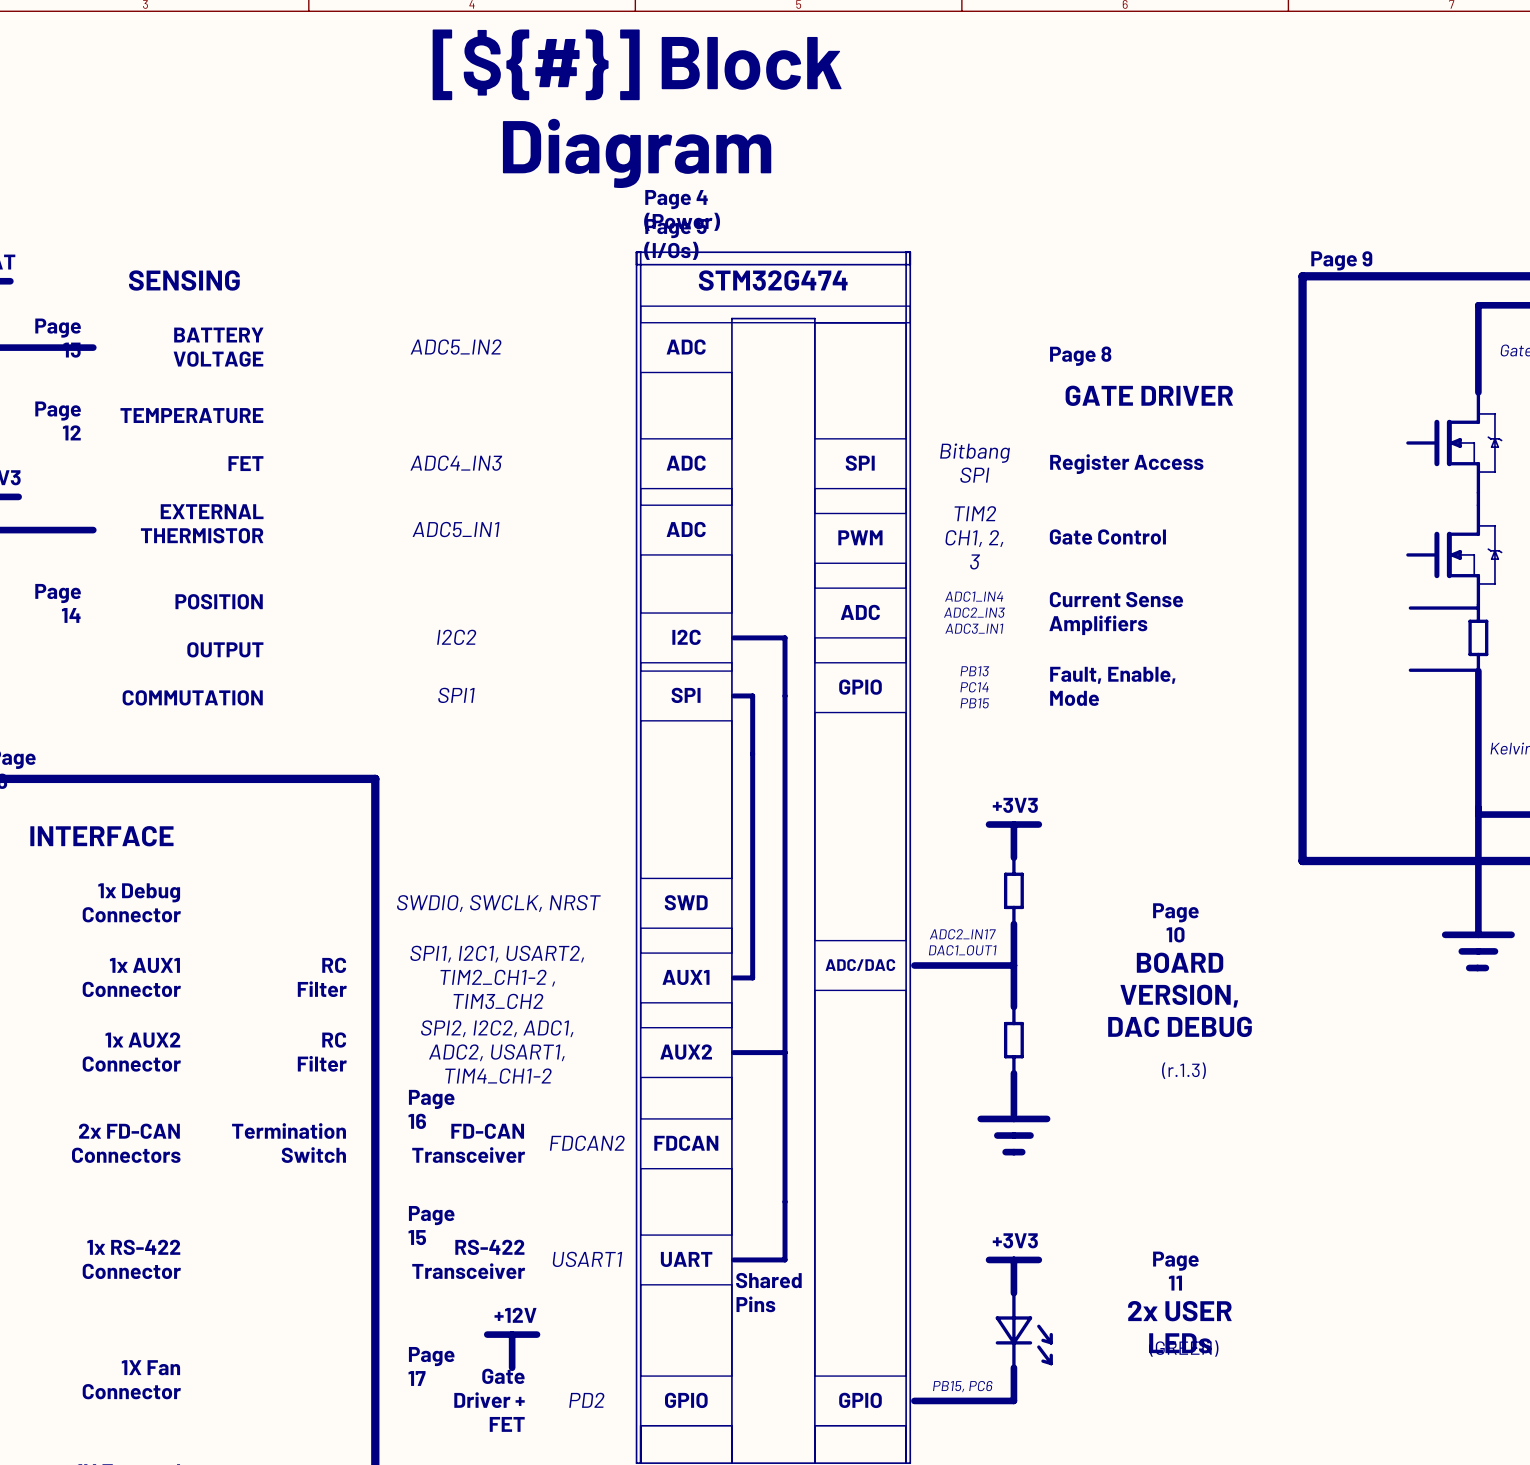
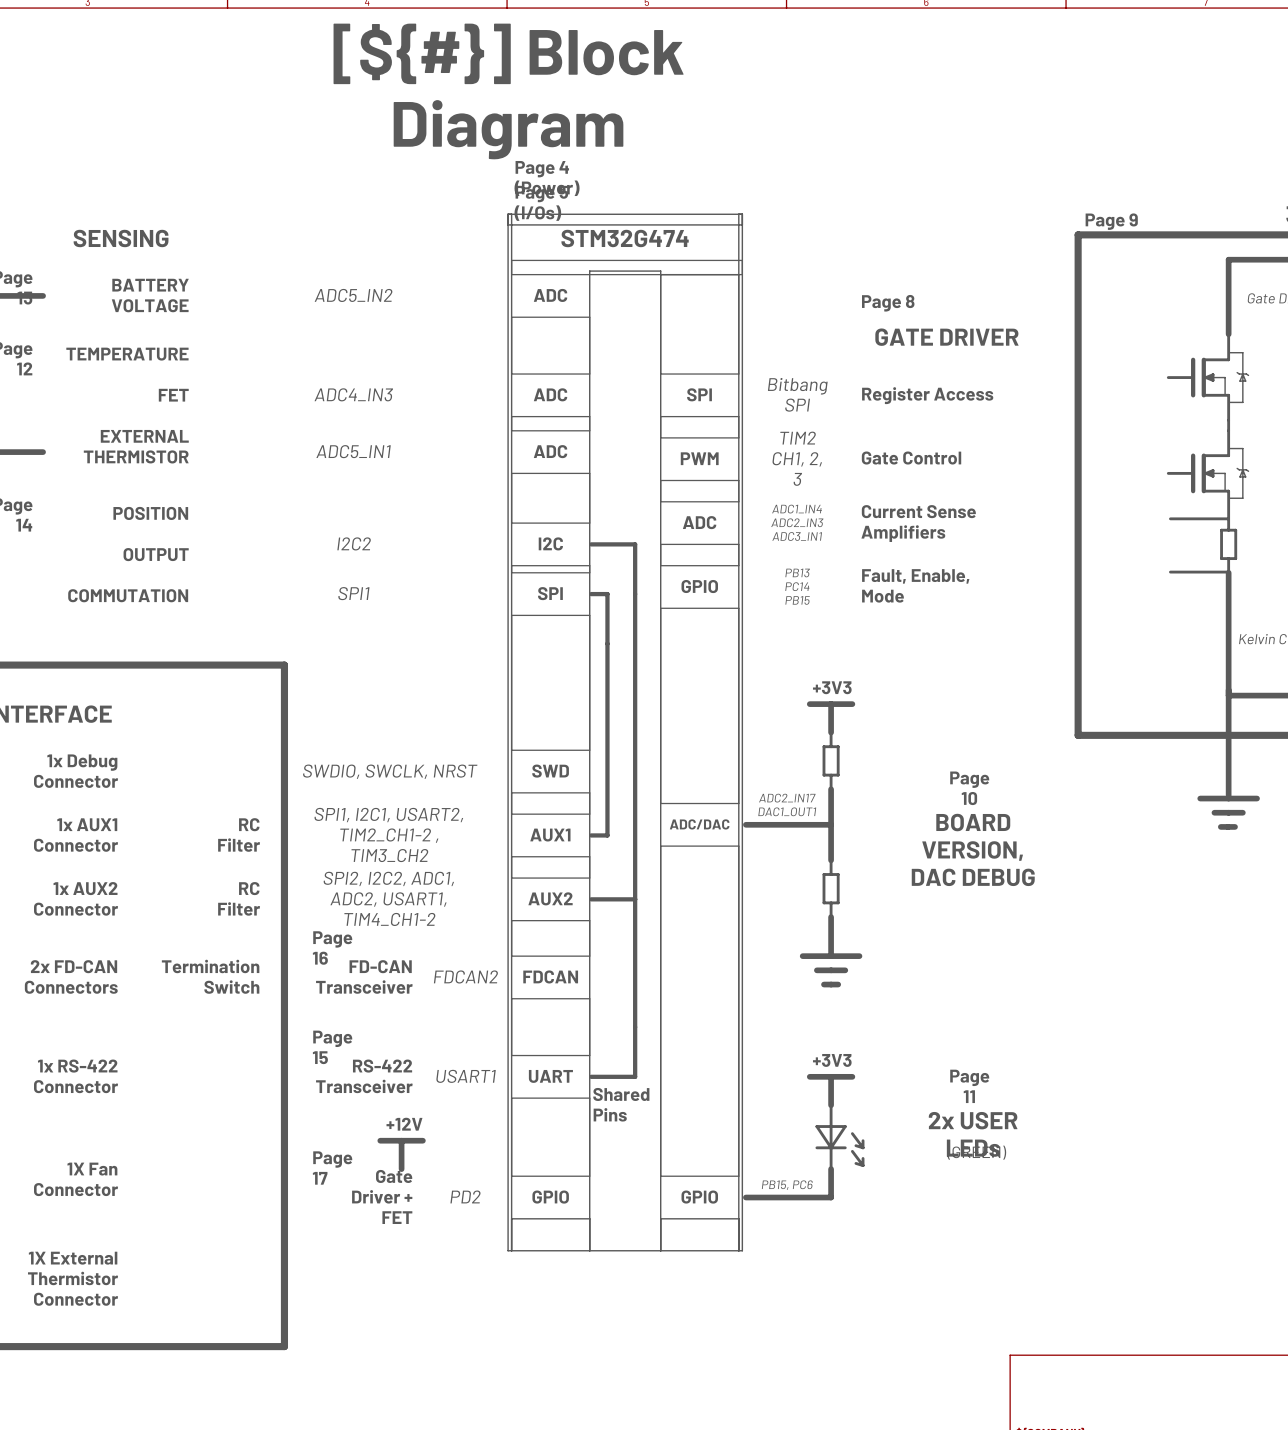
text: (r.1.3) (1183, 1070) -> none

